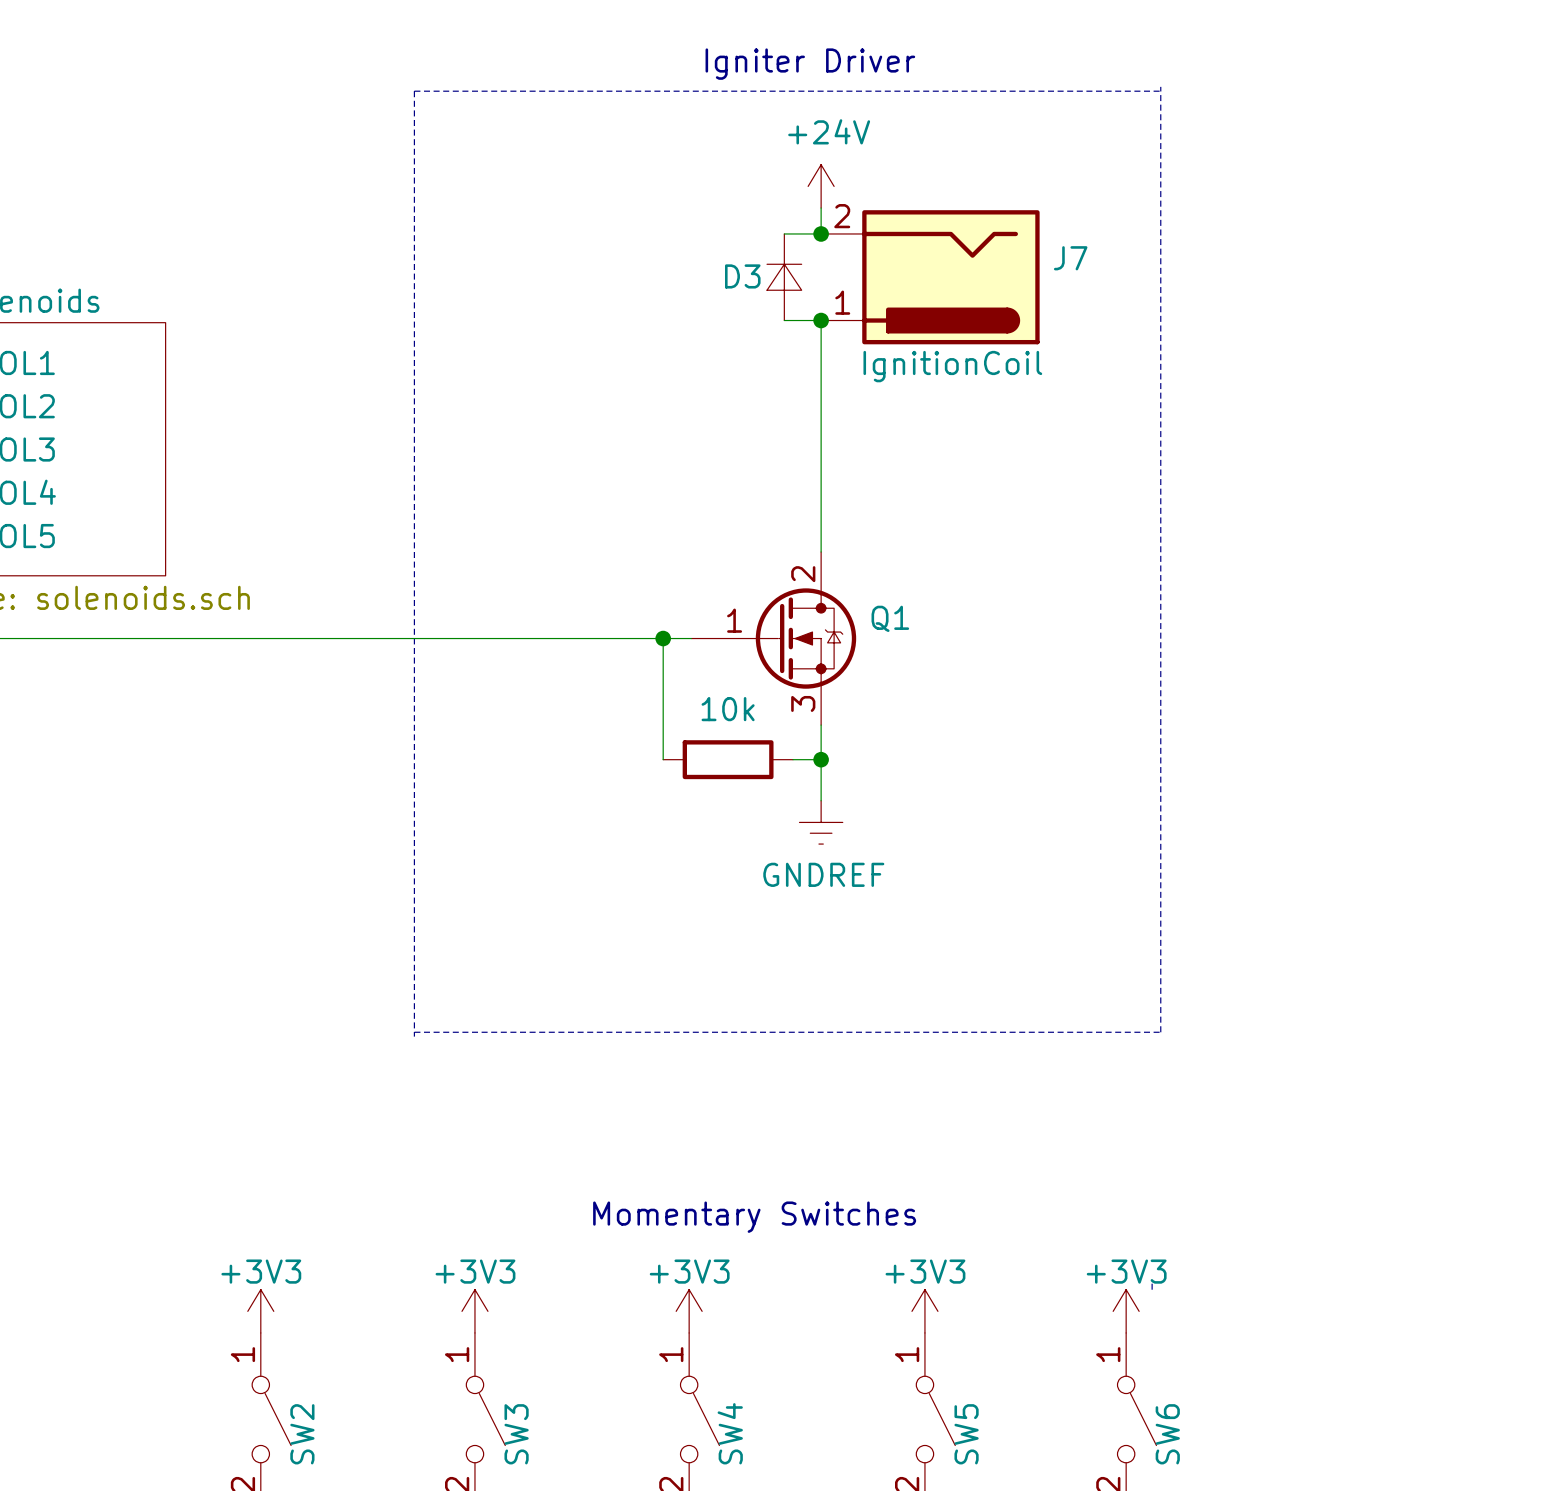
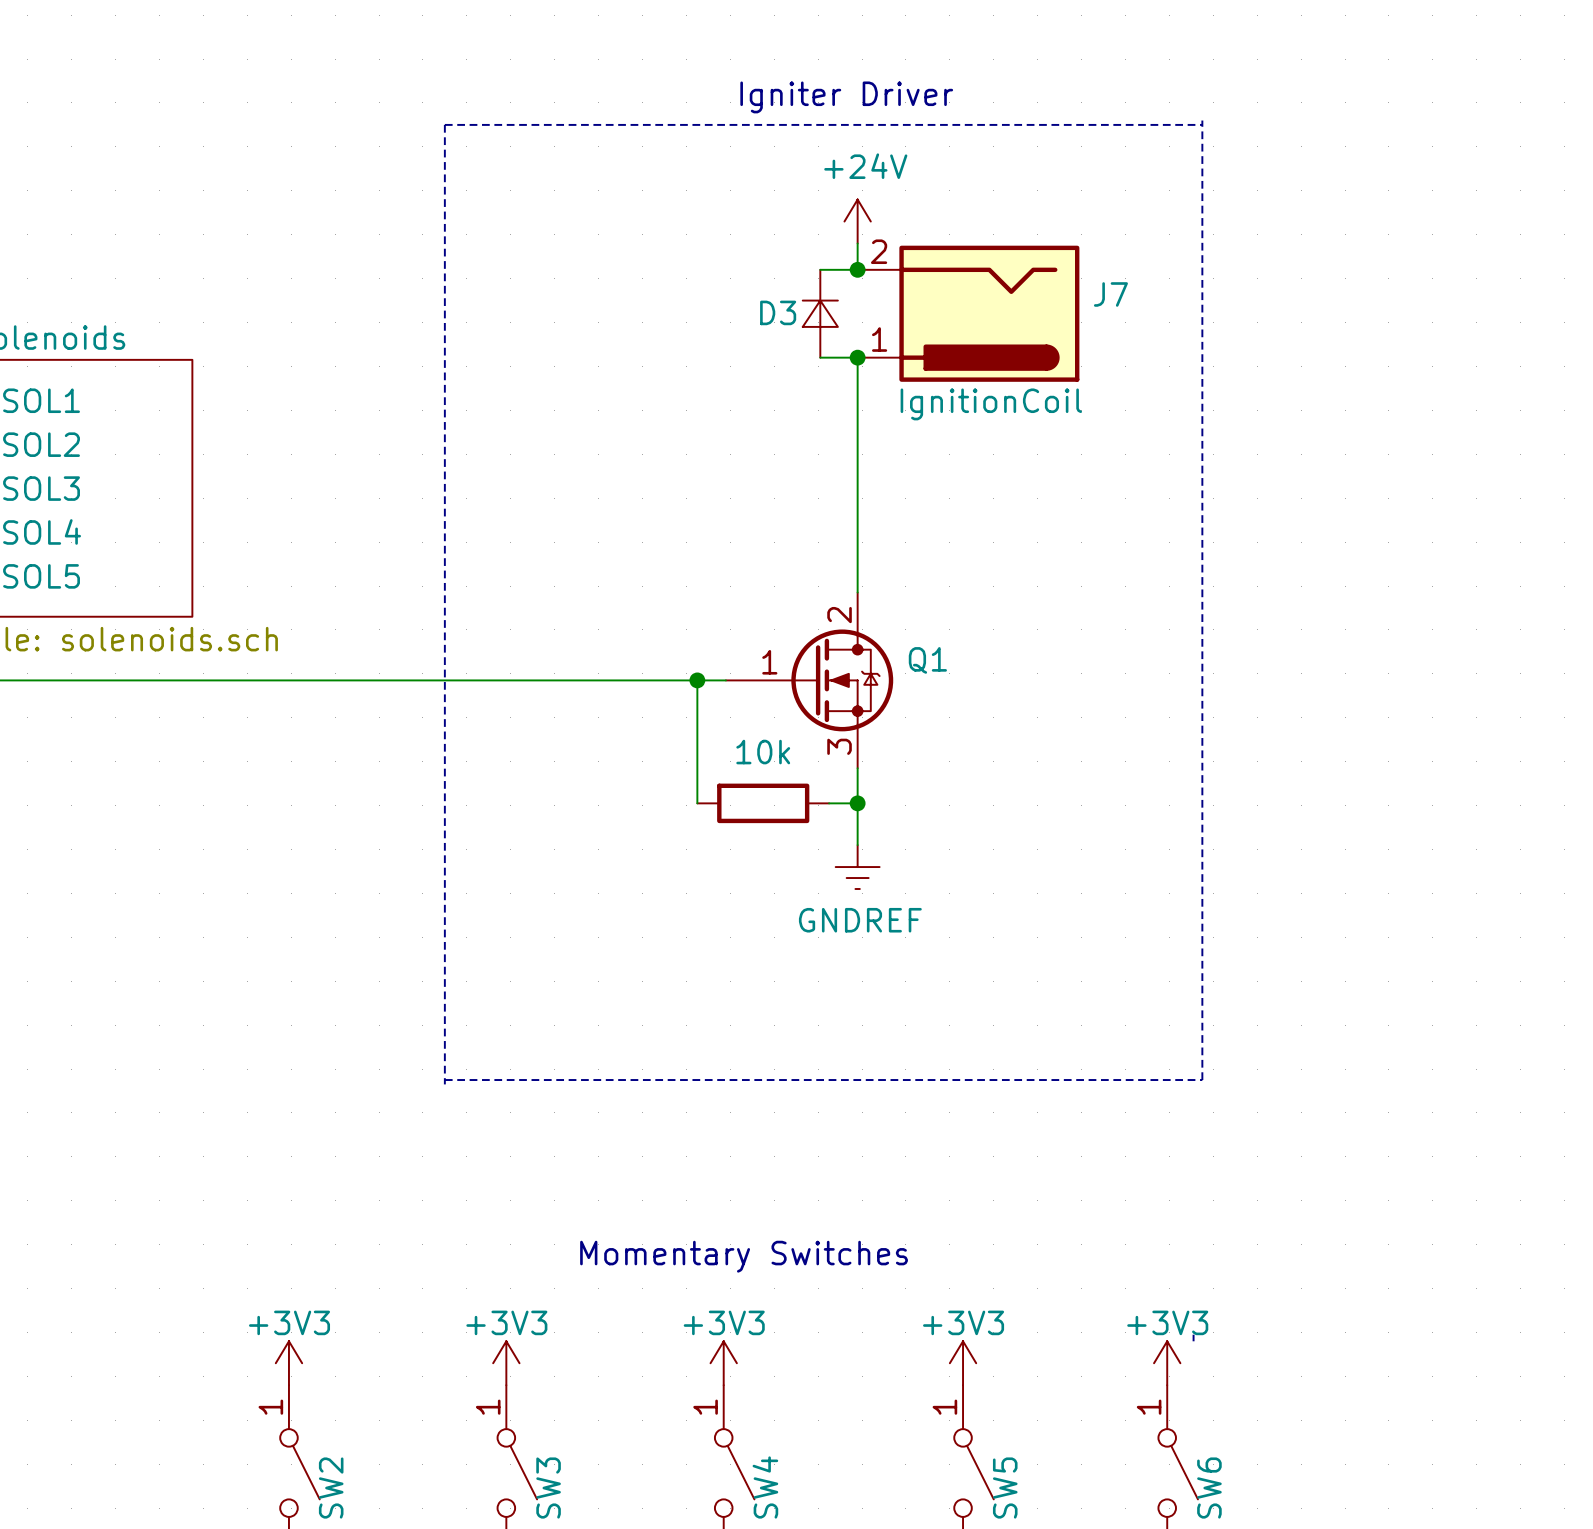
text position: Momentary Switches (754, 1217) -> Momentary Switches (744, 1256)

